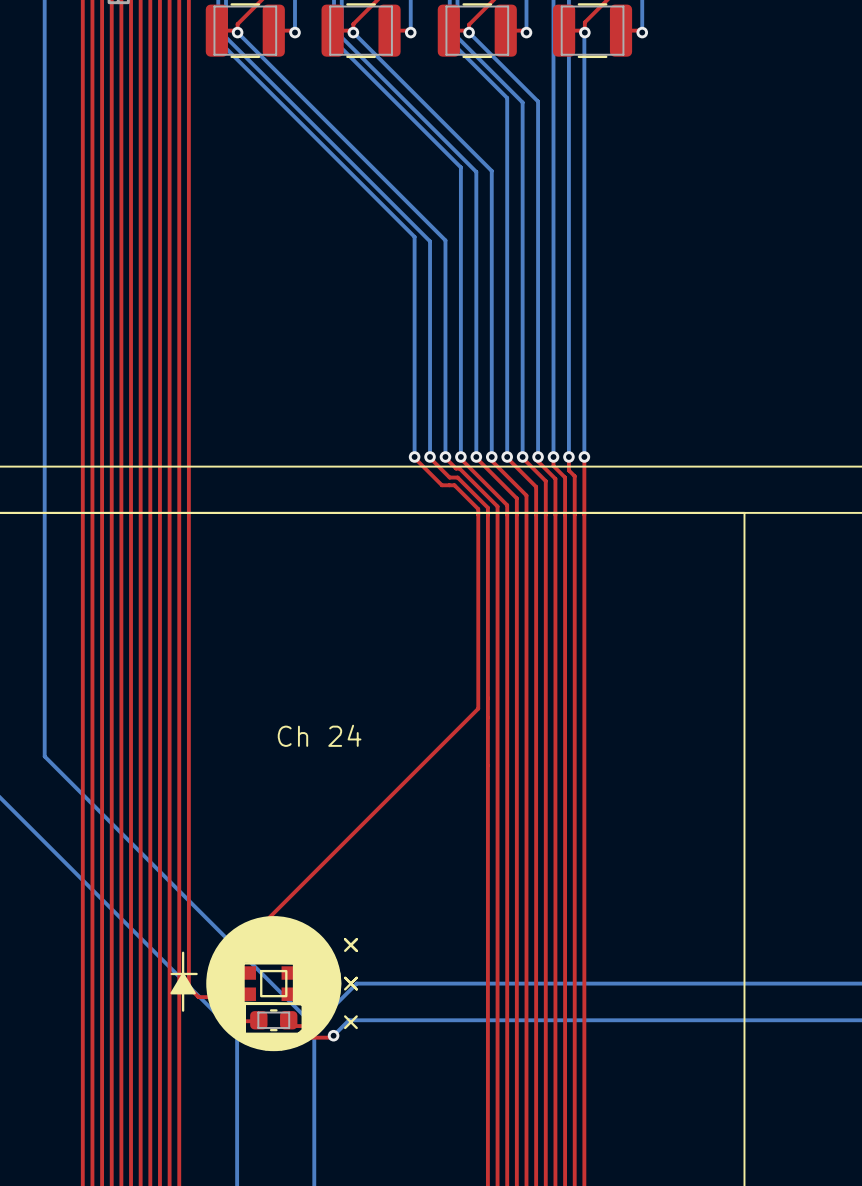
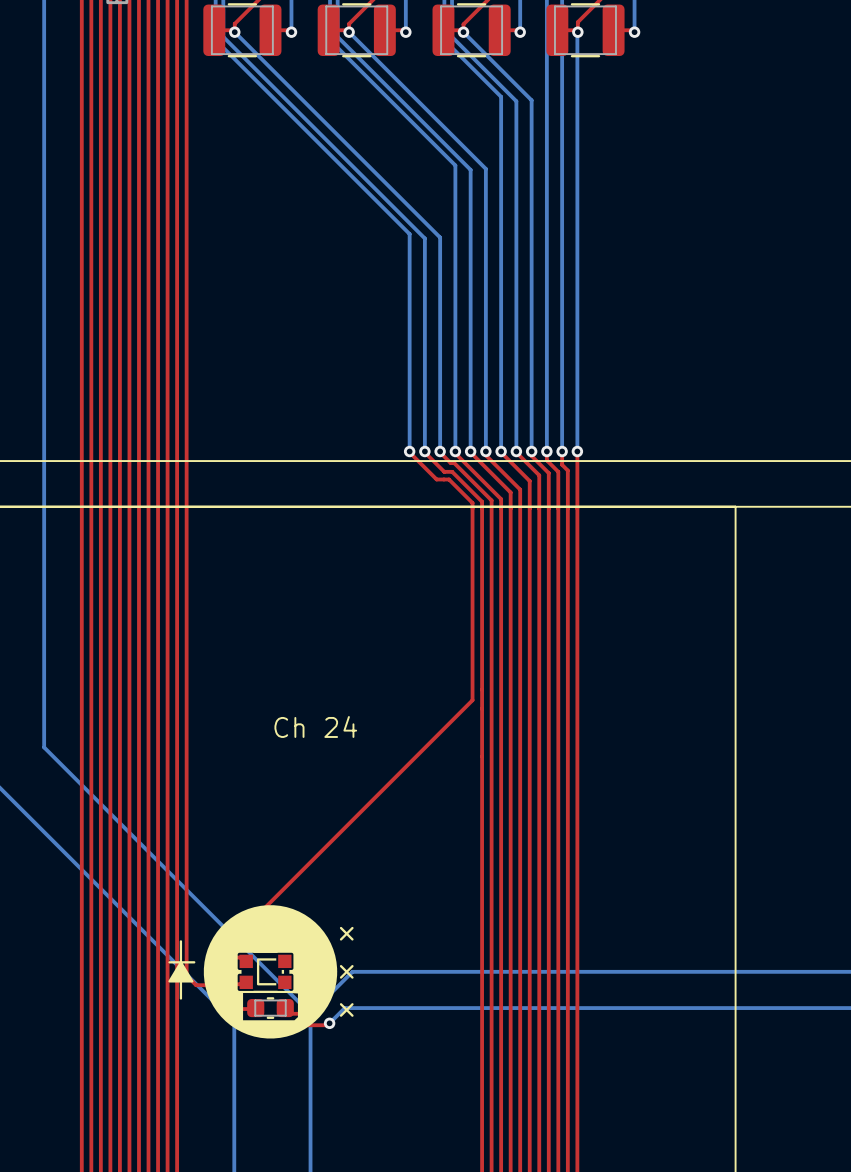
part footprint: [170, 916, 358, 1052] -> [168, 905, 354, 1039]

